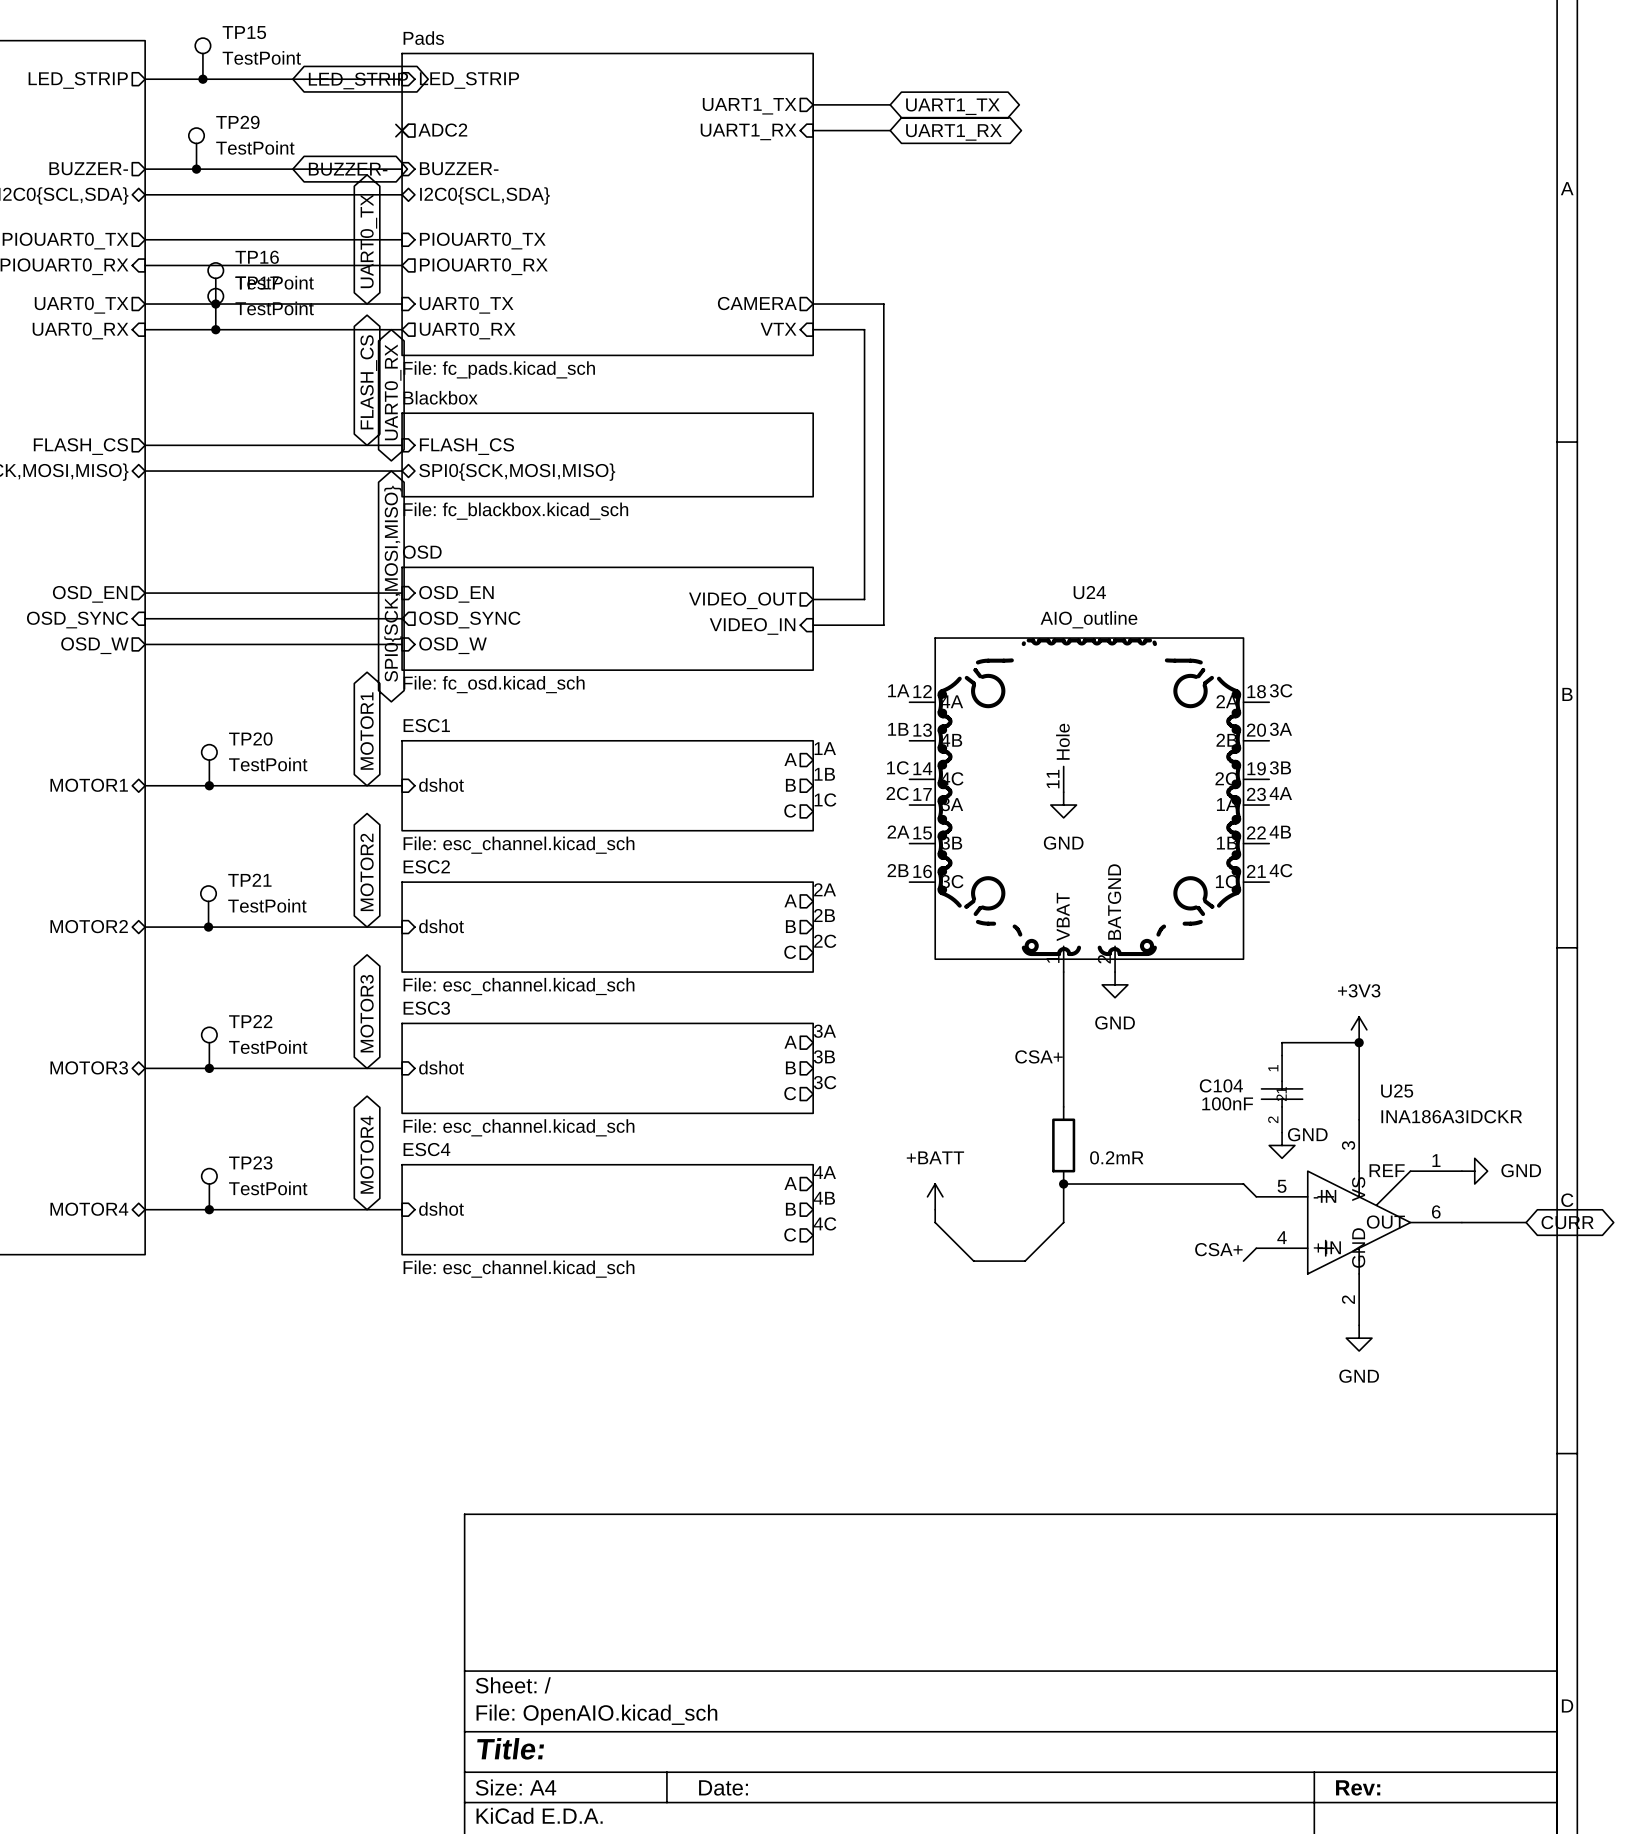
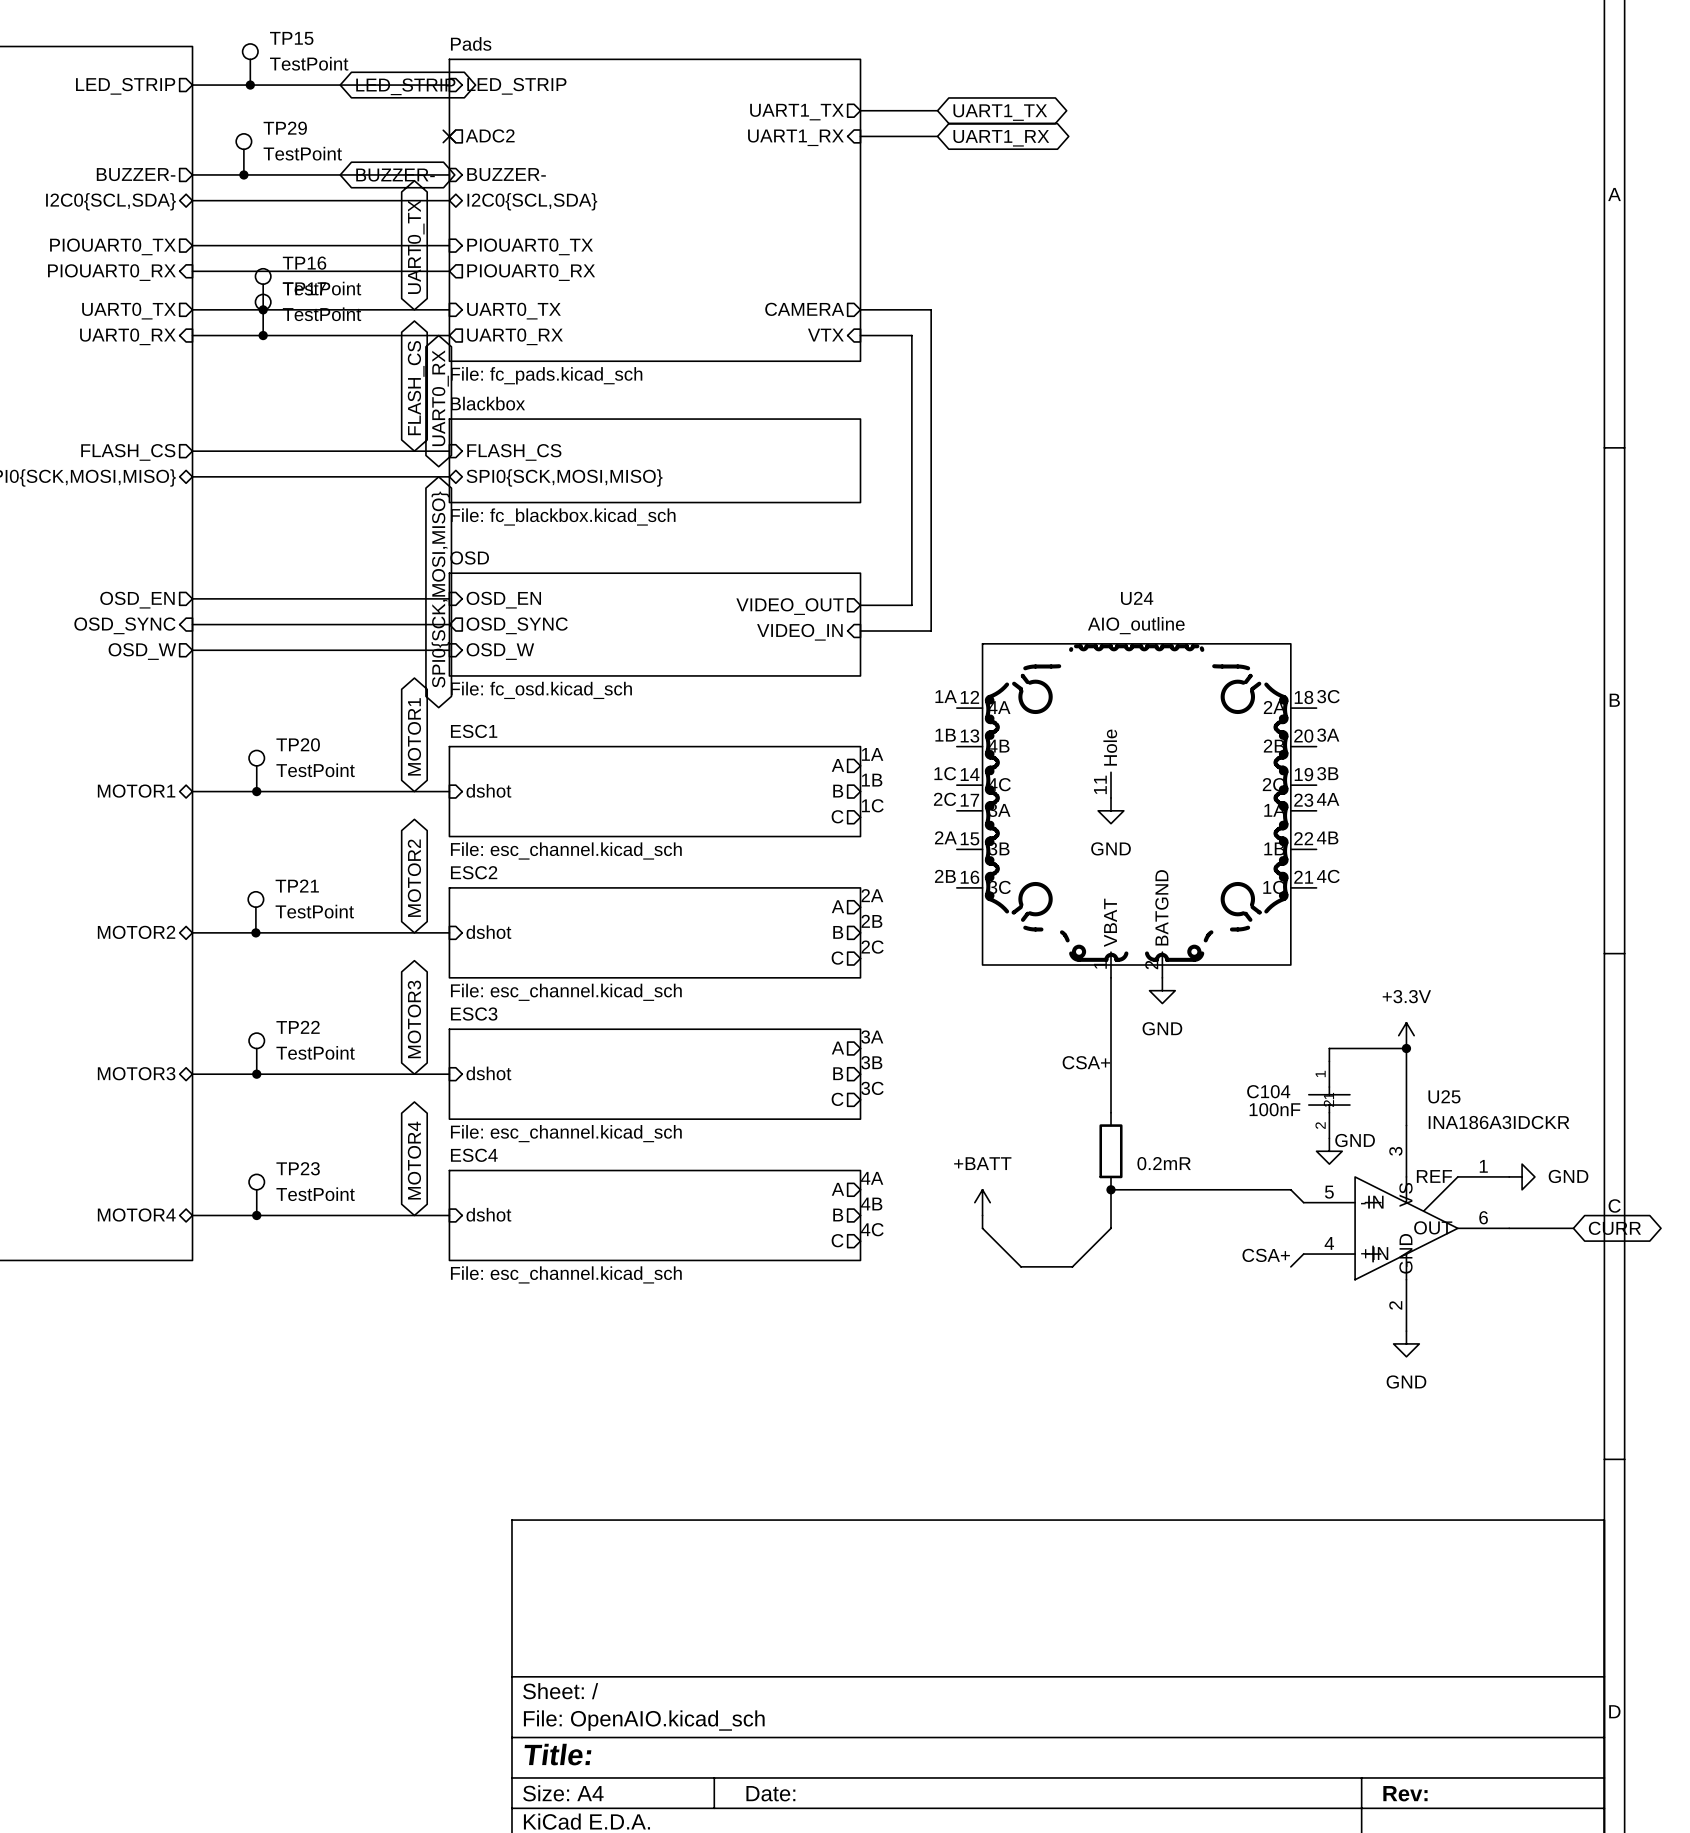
power symbol: +3V3 (1359, 1029) -> +3.3V (1406, 1035)

